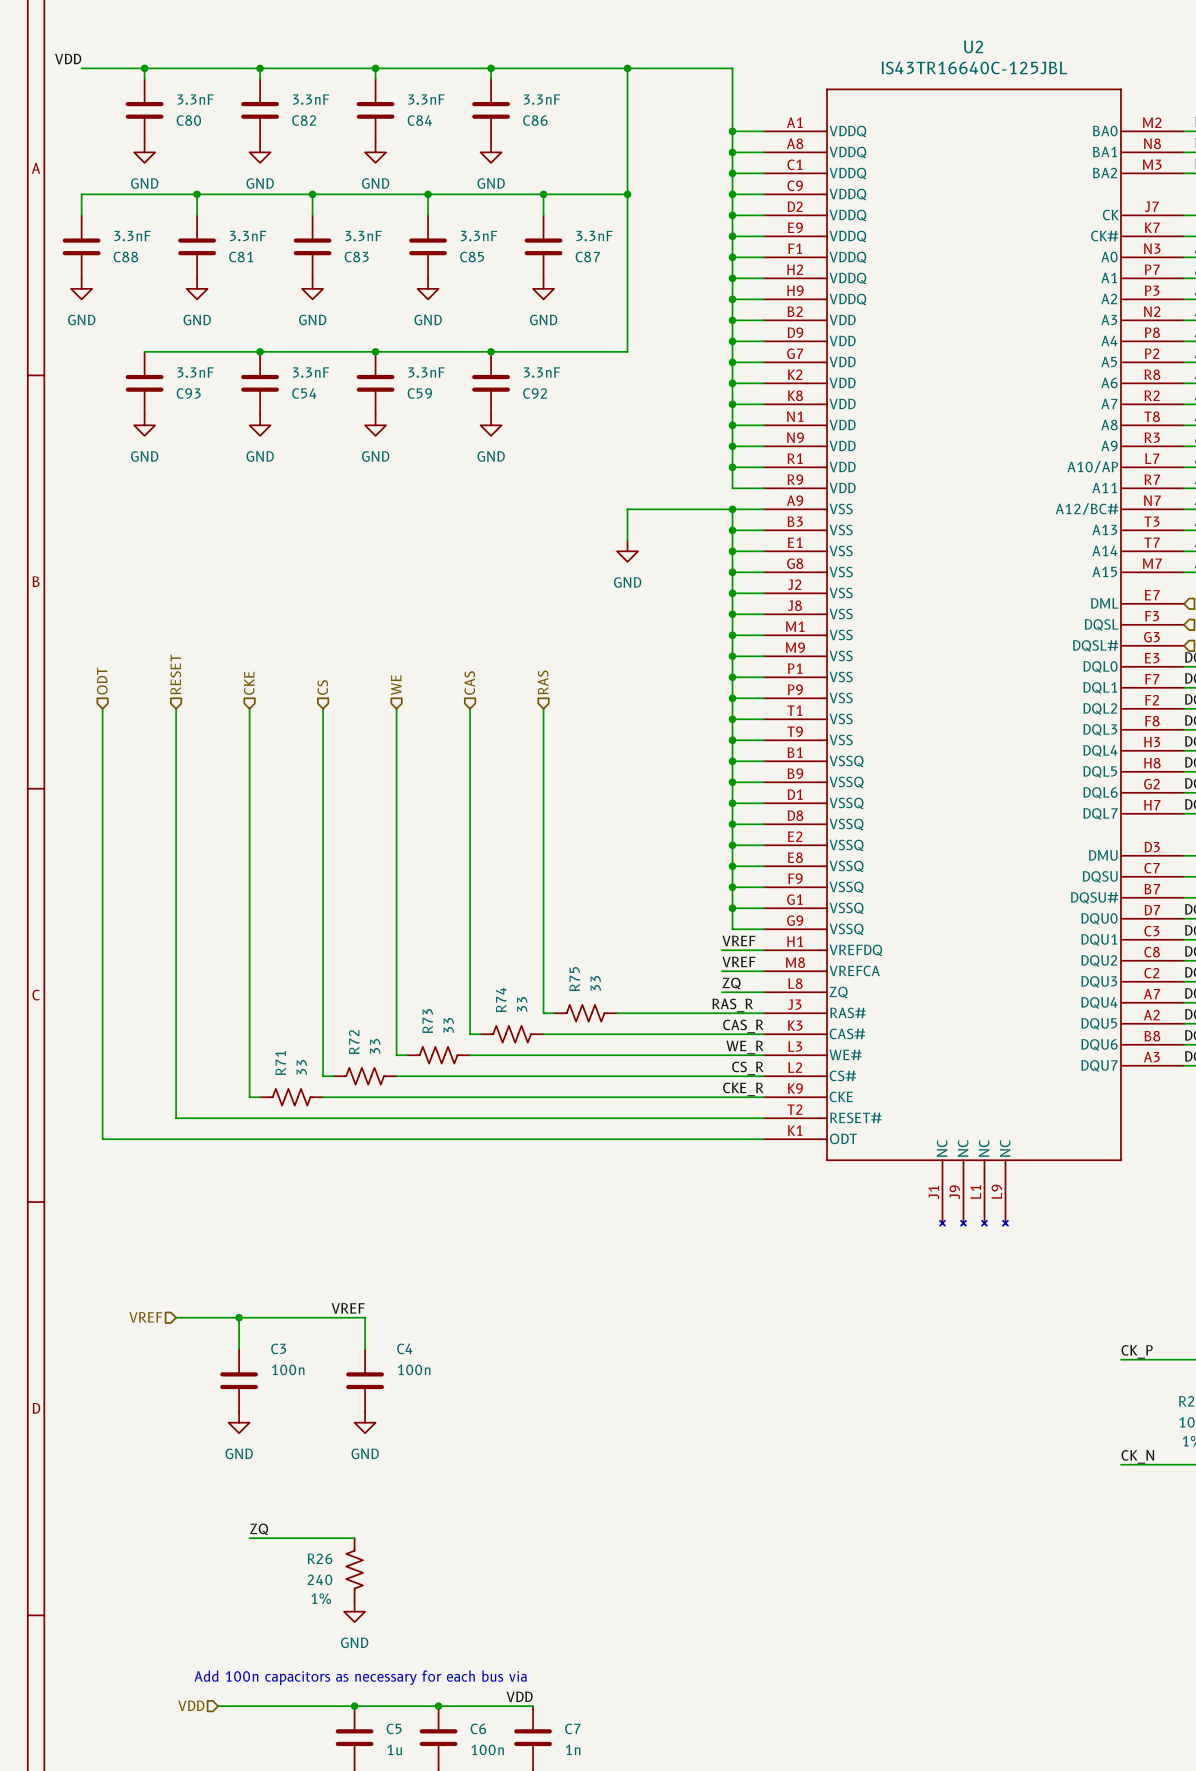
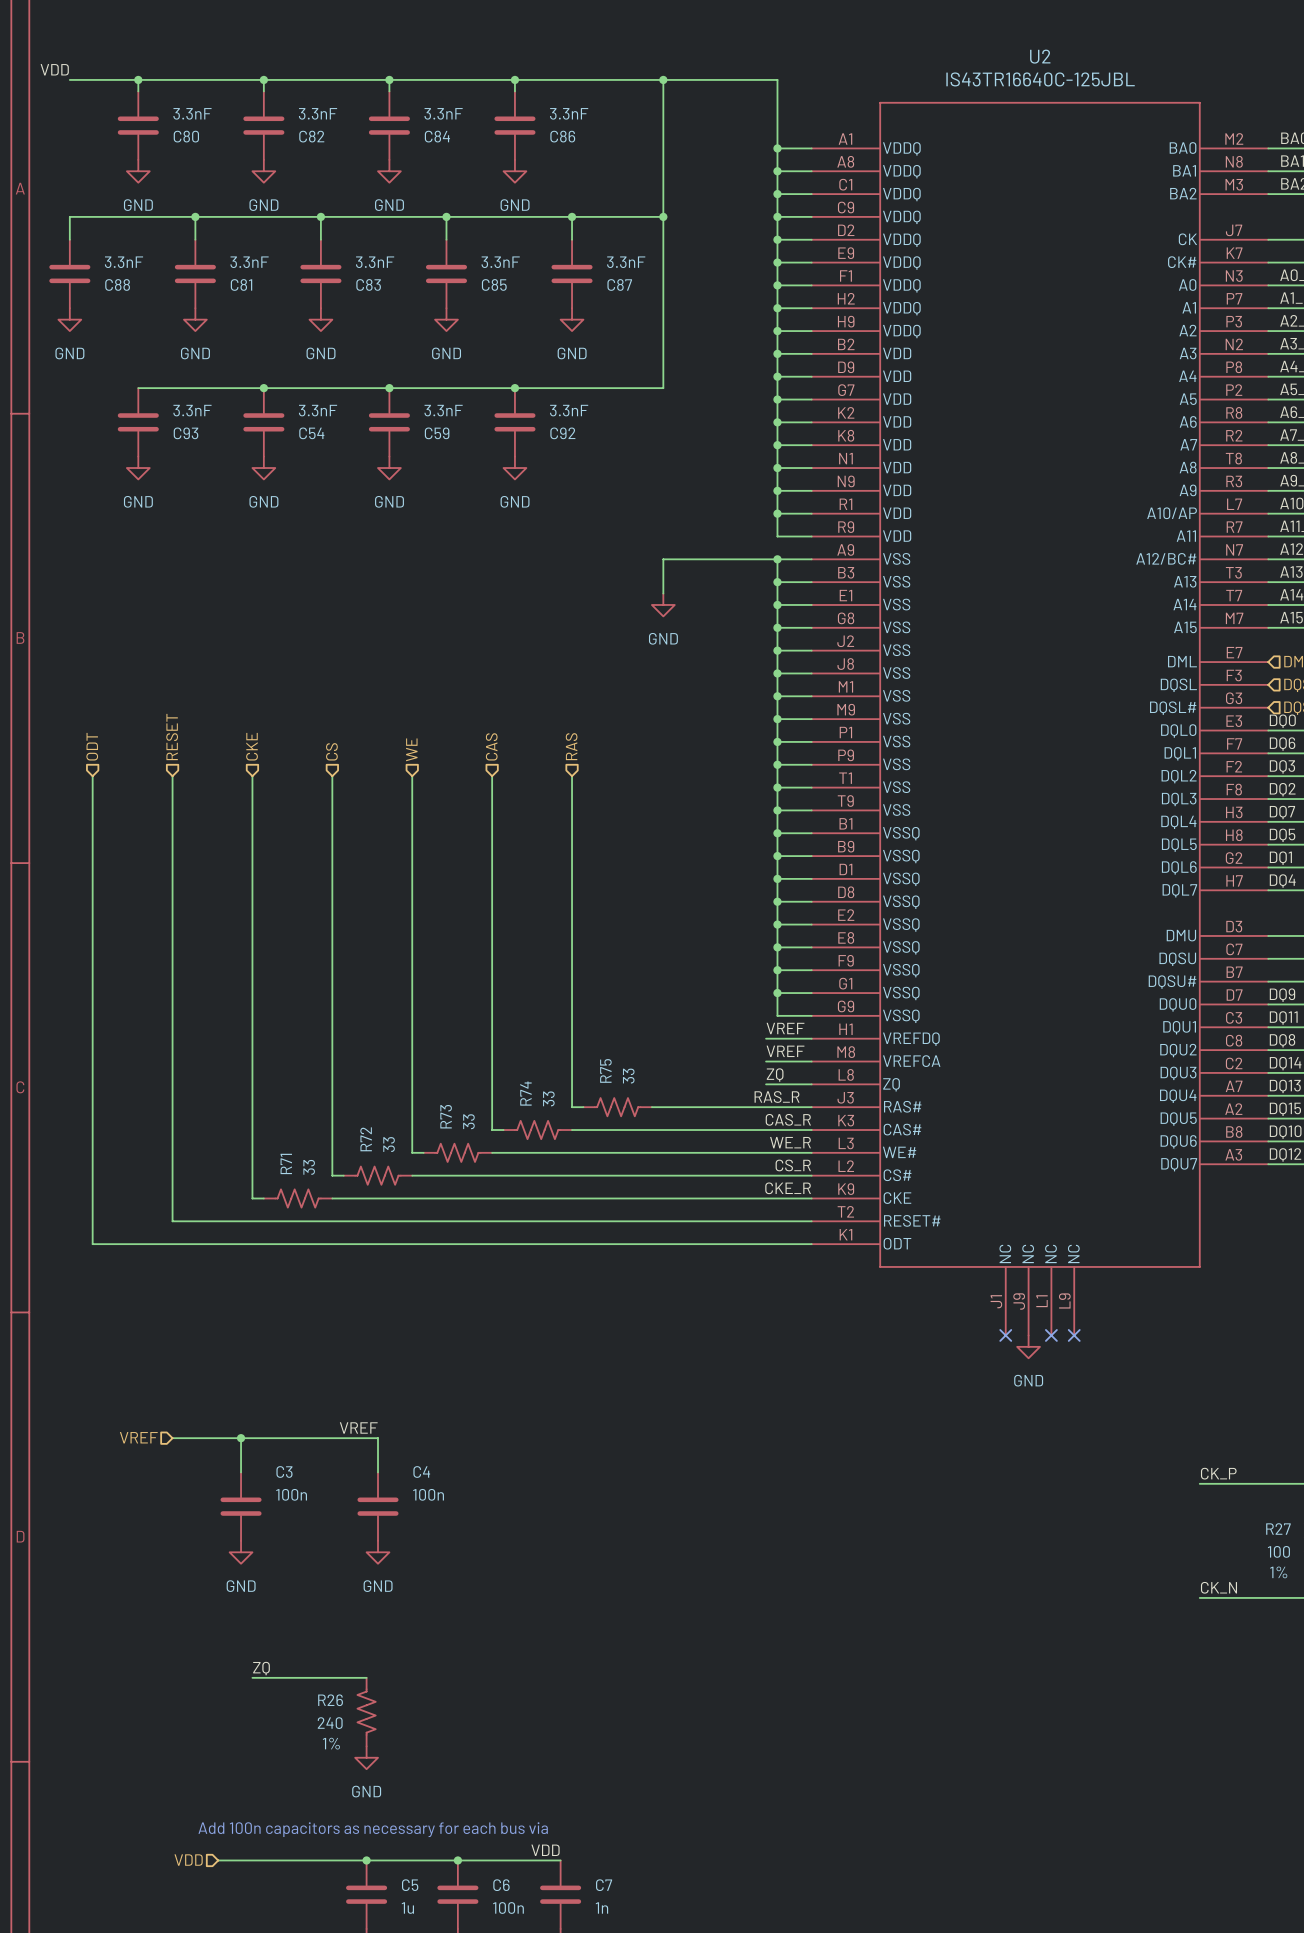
U2 symbol: [764, 88, 1184, 1226] -> [811, 102, 1269, 1336]
no-connect mark: none -> (1005, 1335)
no-connect mark: none -> (1051, 1335)
no-connect mark: none -> (1074, 1335)
power symbol: none -> GND (1028, 1346)

